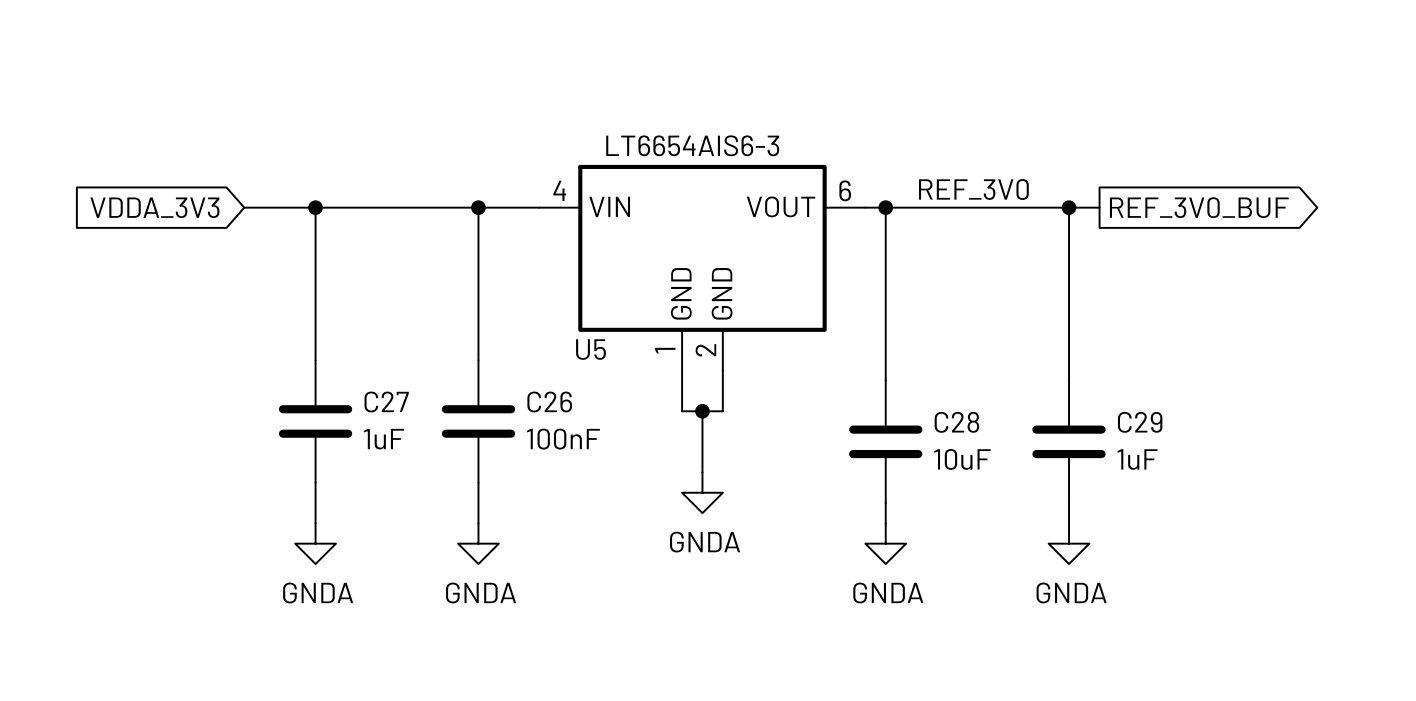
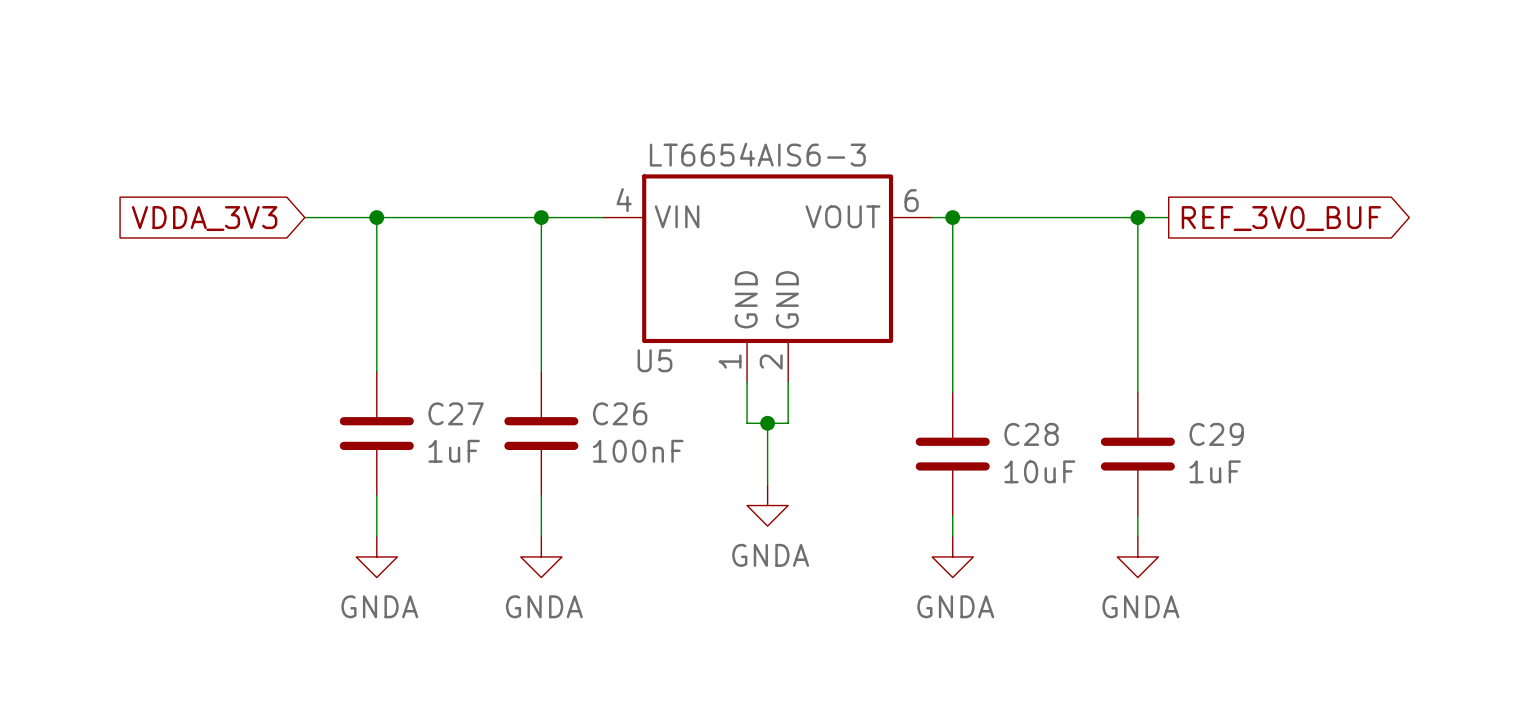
label: REF_3V0 (973, 189) -> none

